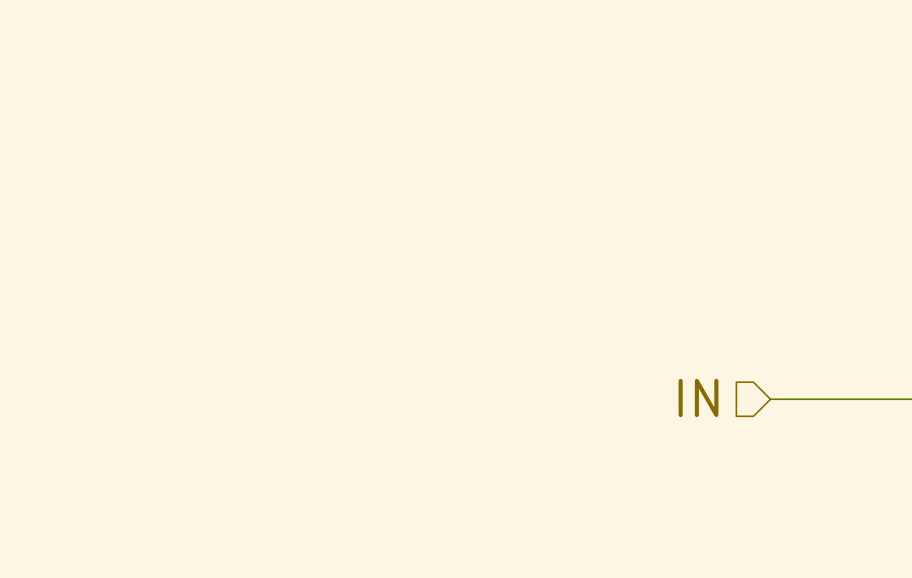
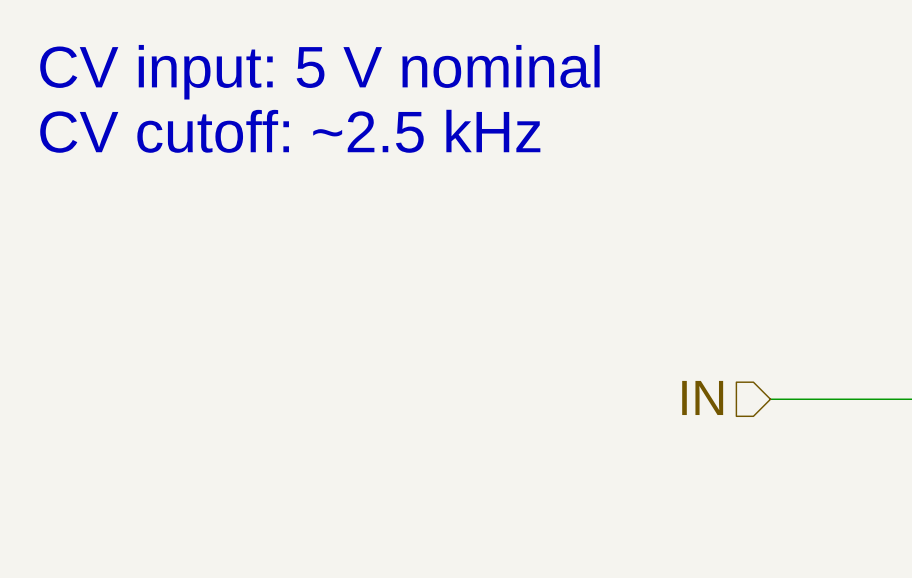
text: none -> CV input: 5 V nominal (319, 72)
text: none -> CV cutoff: ~2.5 kHz (290, 131)

